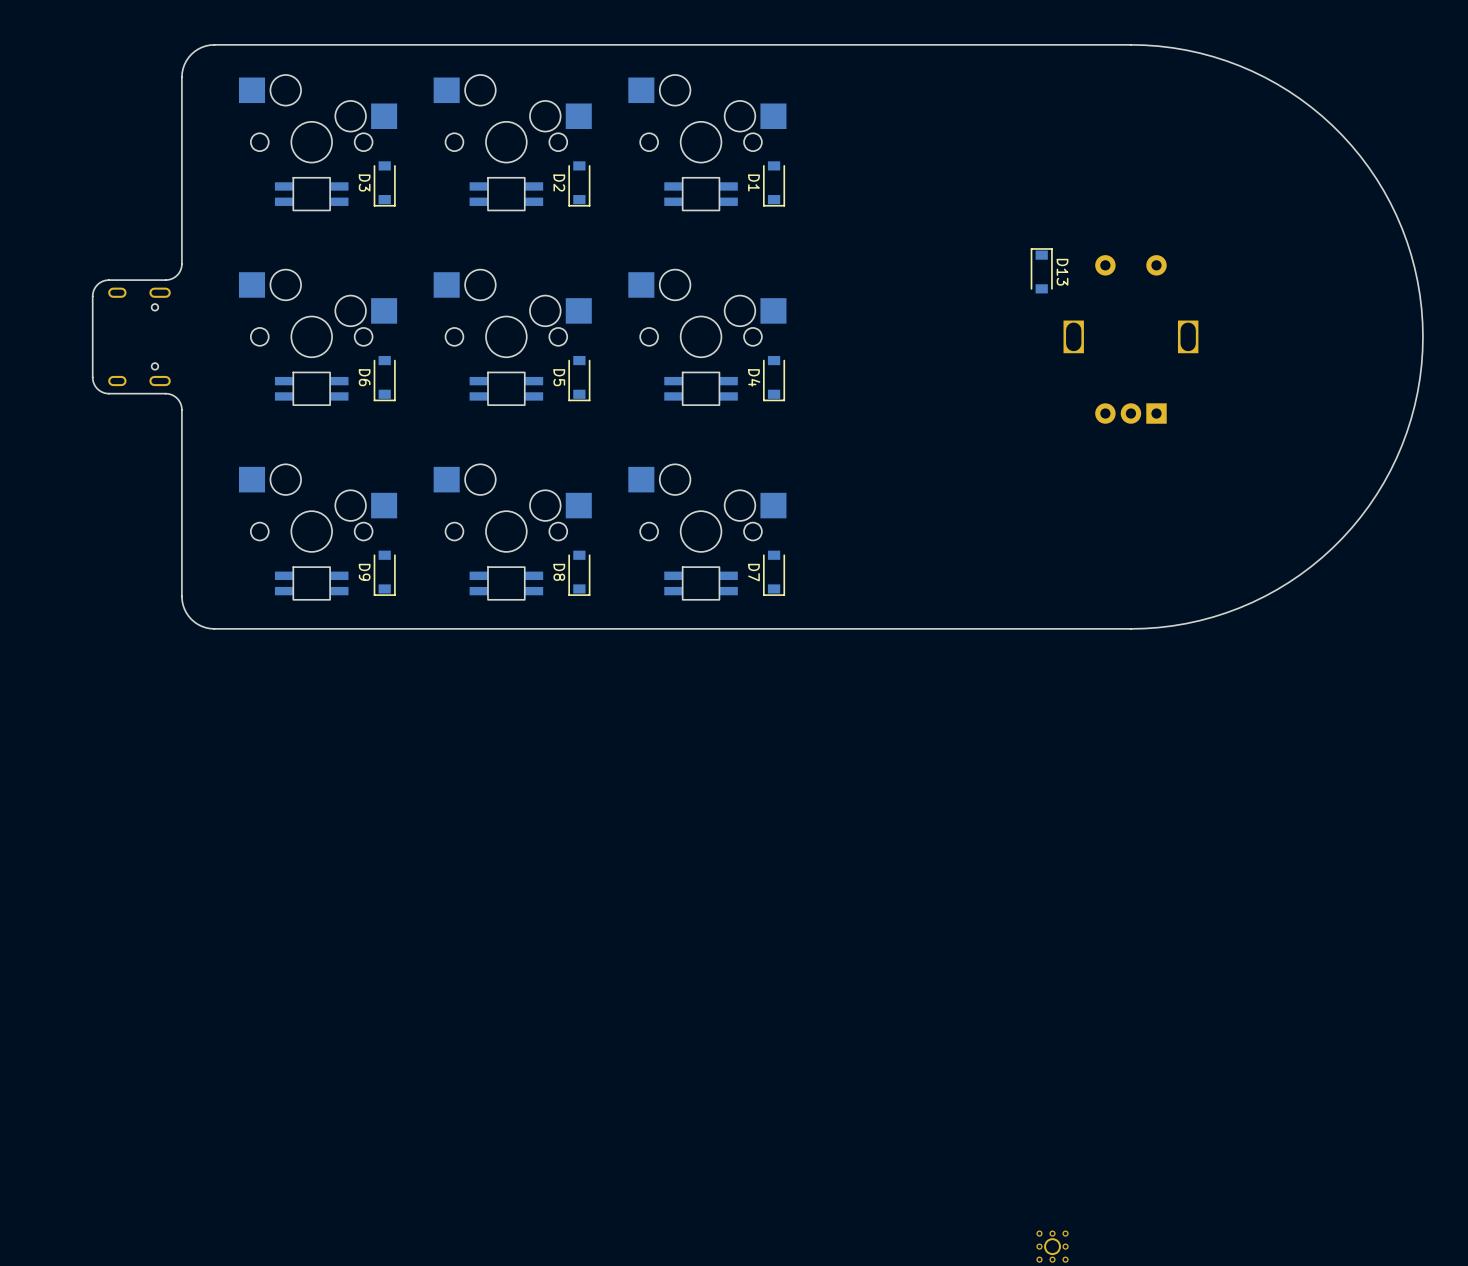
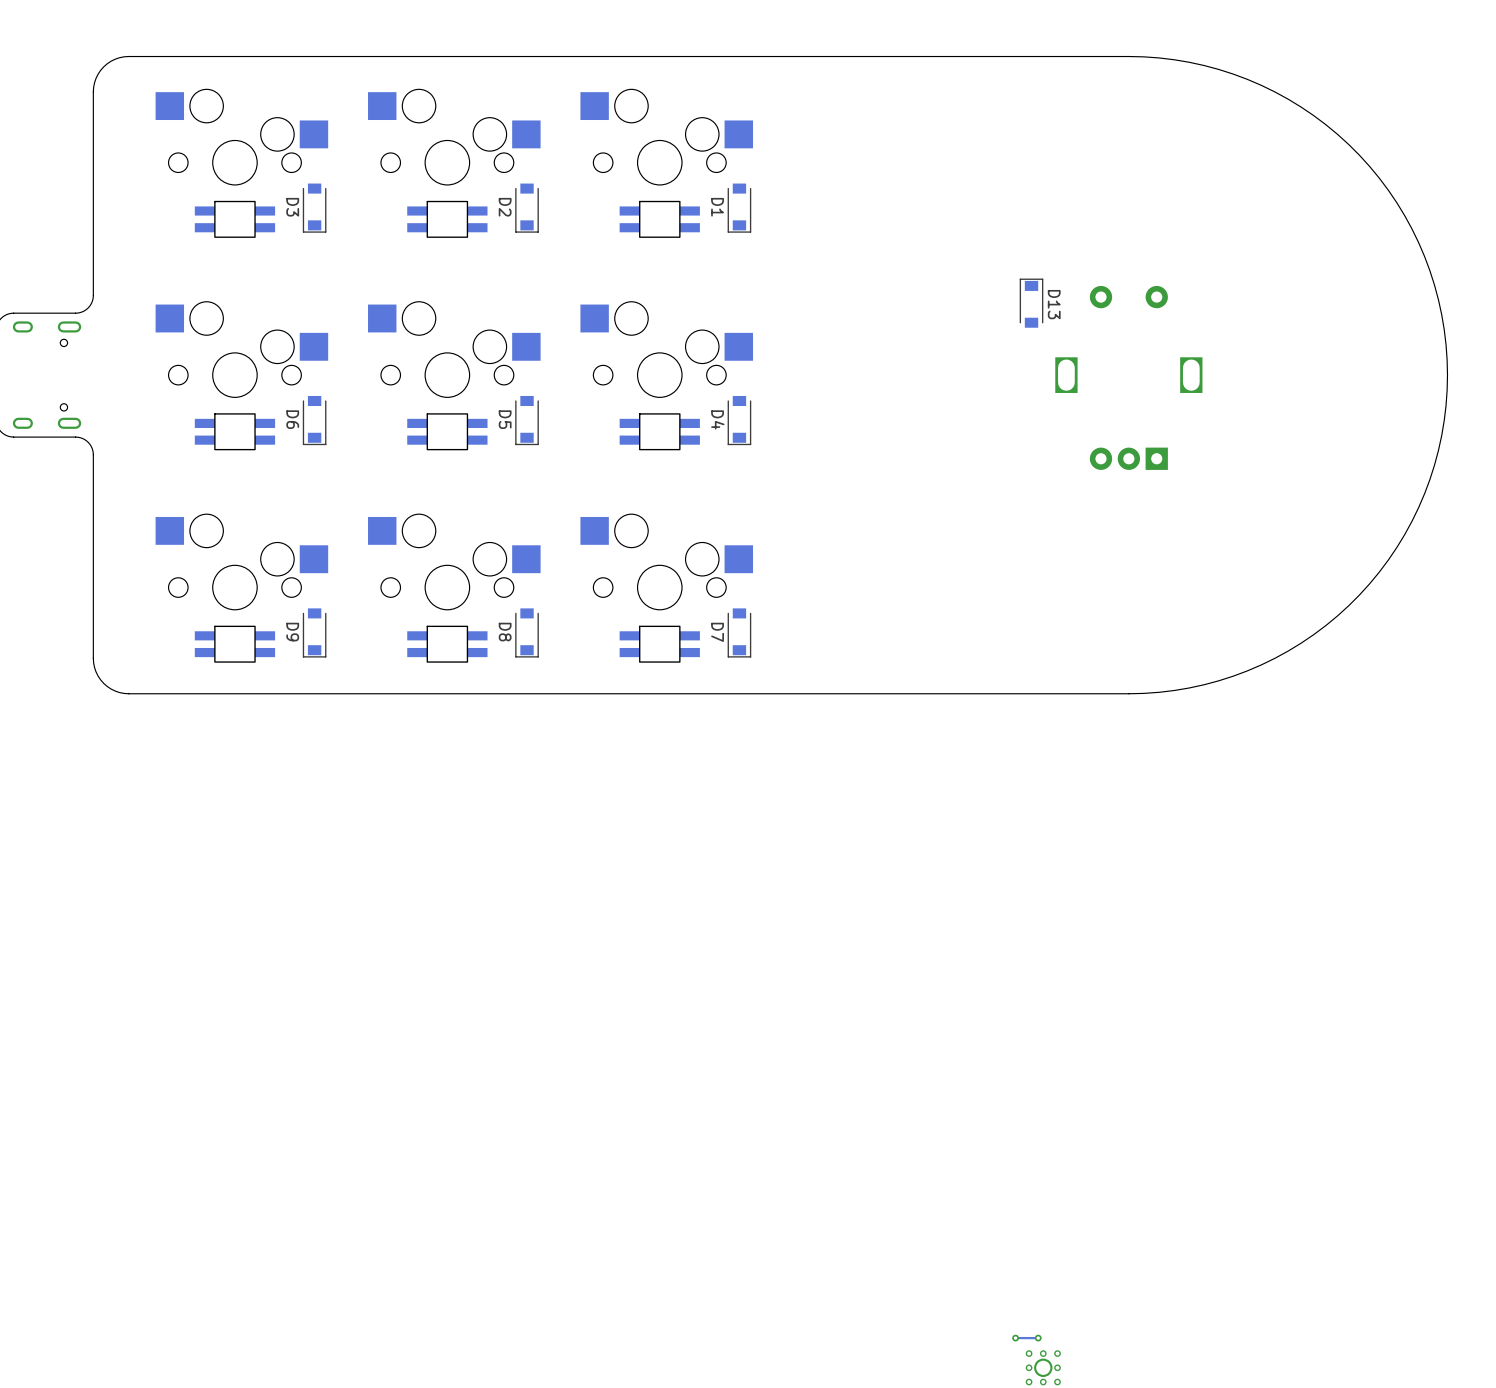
via: none -> (1015, 1338)
track: none -> (1038, 1338) (1015, 1338)
via: none -> (1038, 1338)

